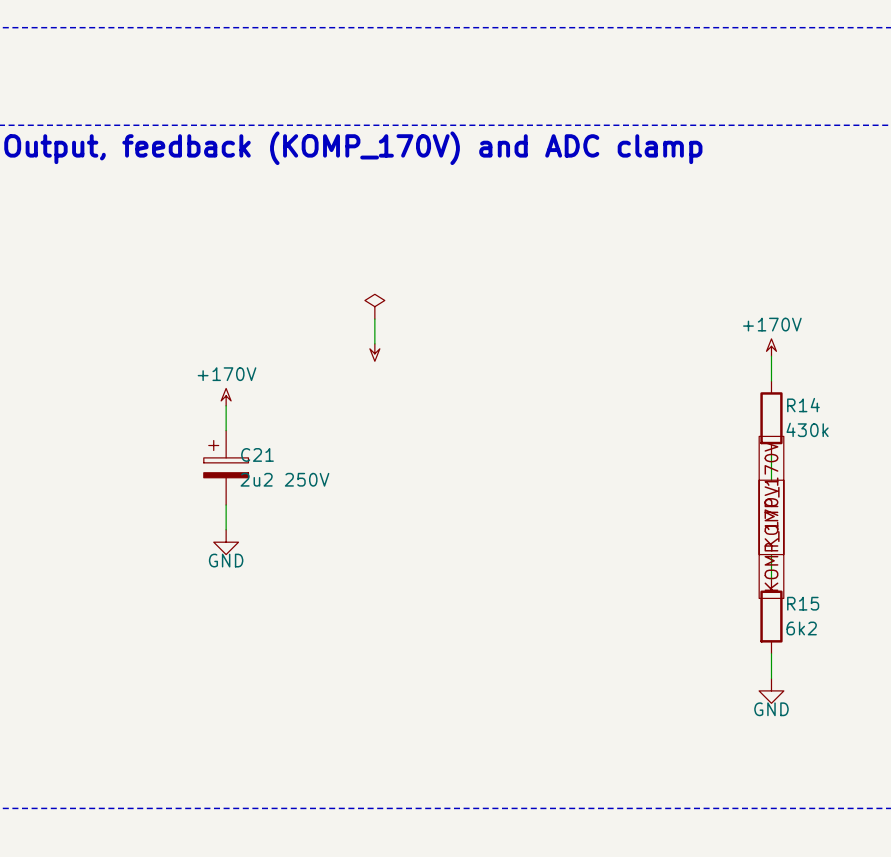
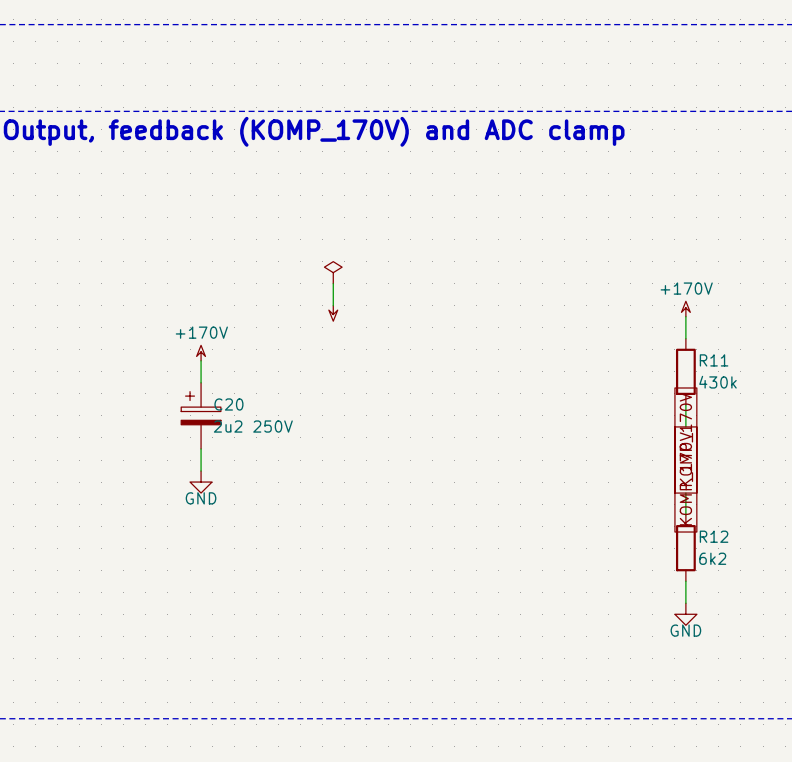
R14 name: R14 (803, 405) -> R11 (714, 360)
C21 name: C21 (257, 454) -> C20 (228, 404)
R15 name: R15 (803, 603) -> R12 (714, 536)

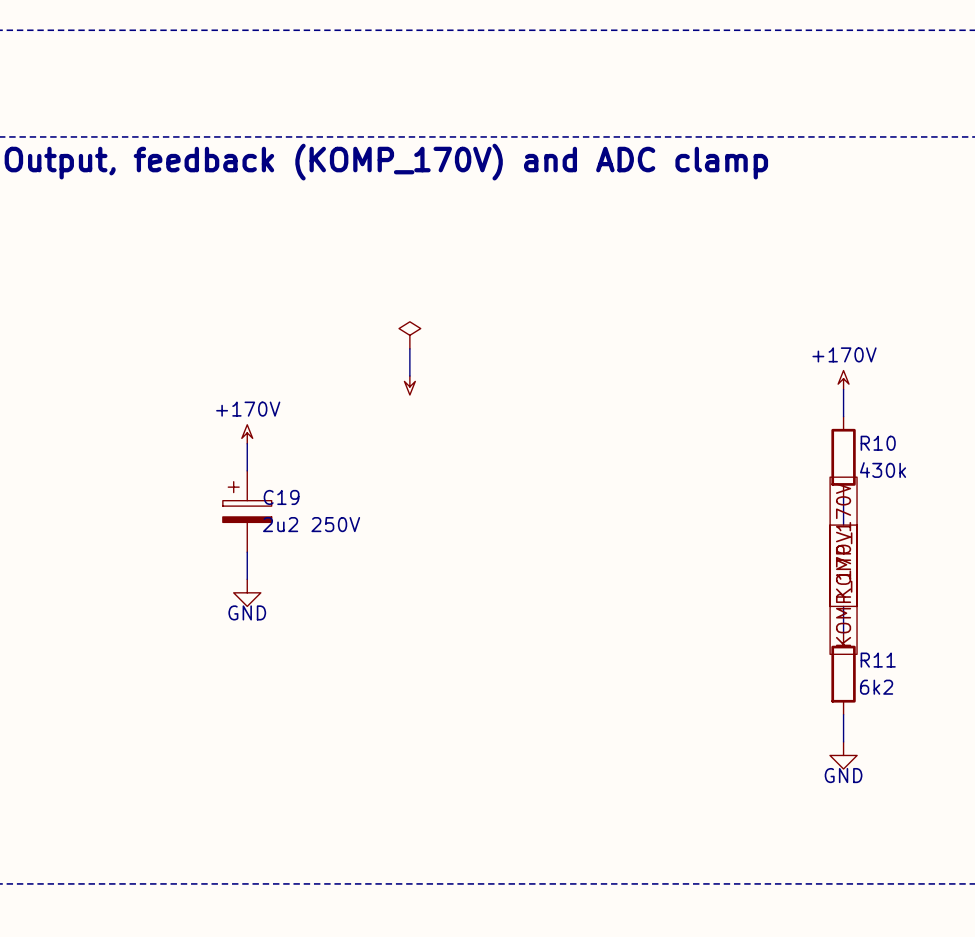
R11 name: R11 (714, 360) -> R10 (878, 443)
C20 name: C20 (228, 404) -> C19 (281, 497)
R12 name: R12 (714, 536) -> R11 (878, 660)

